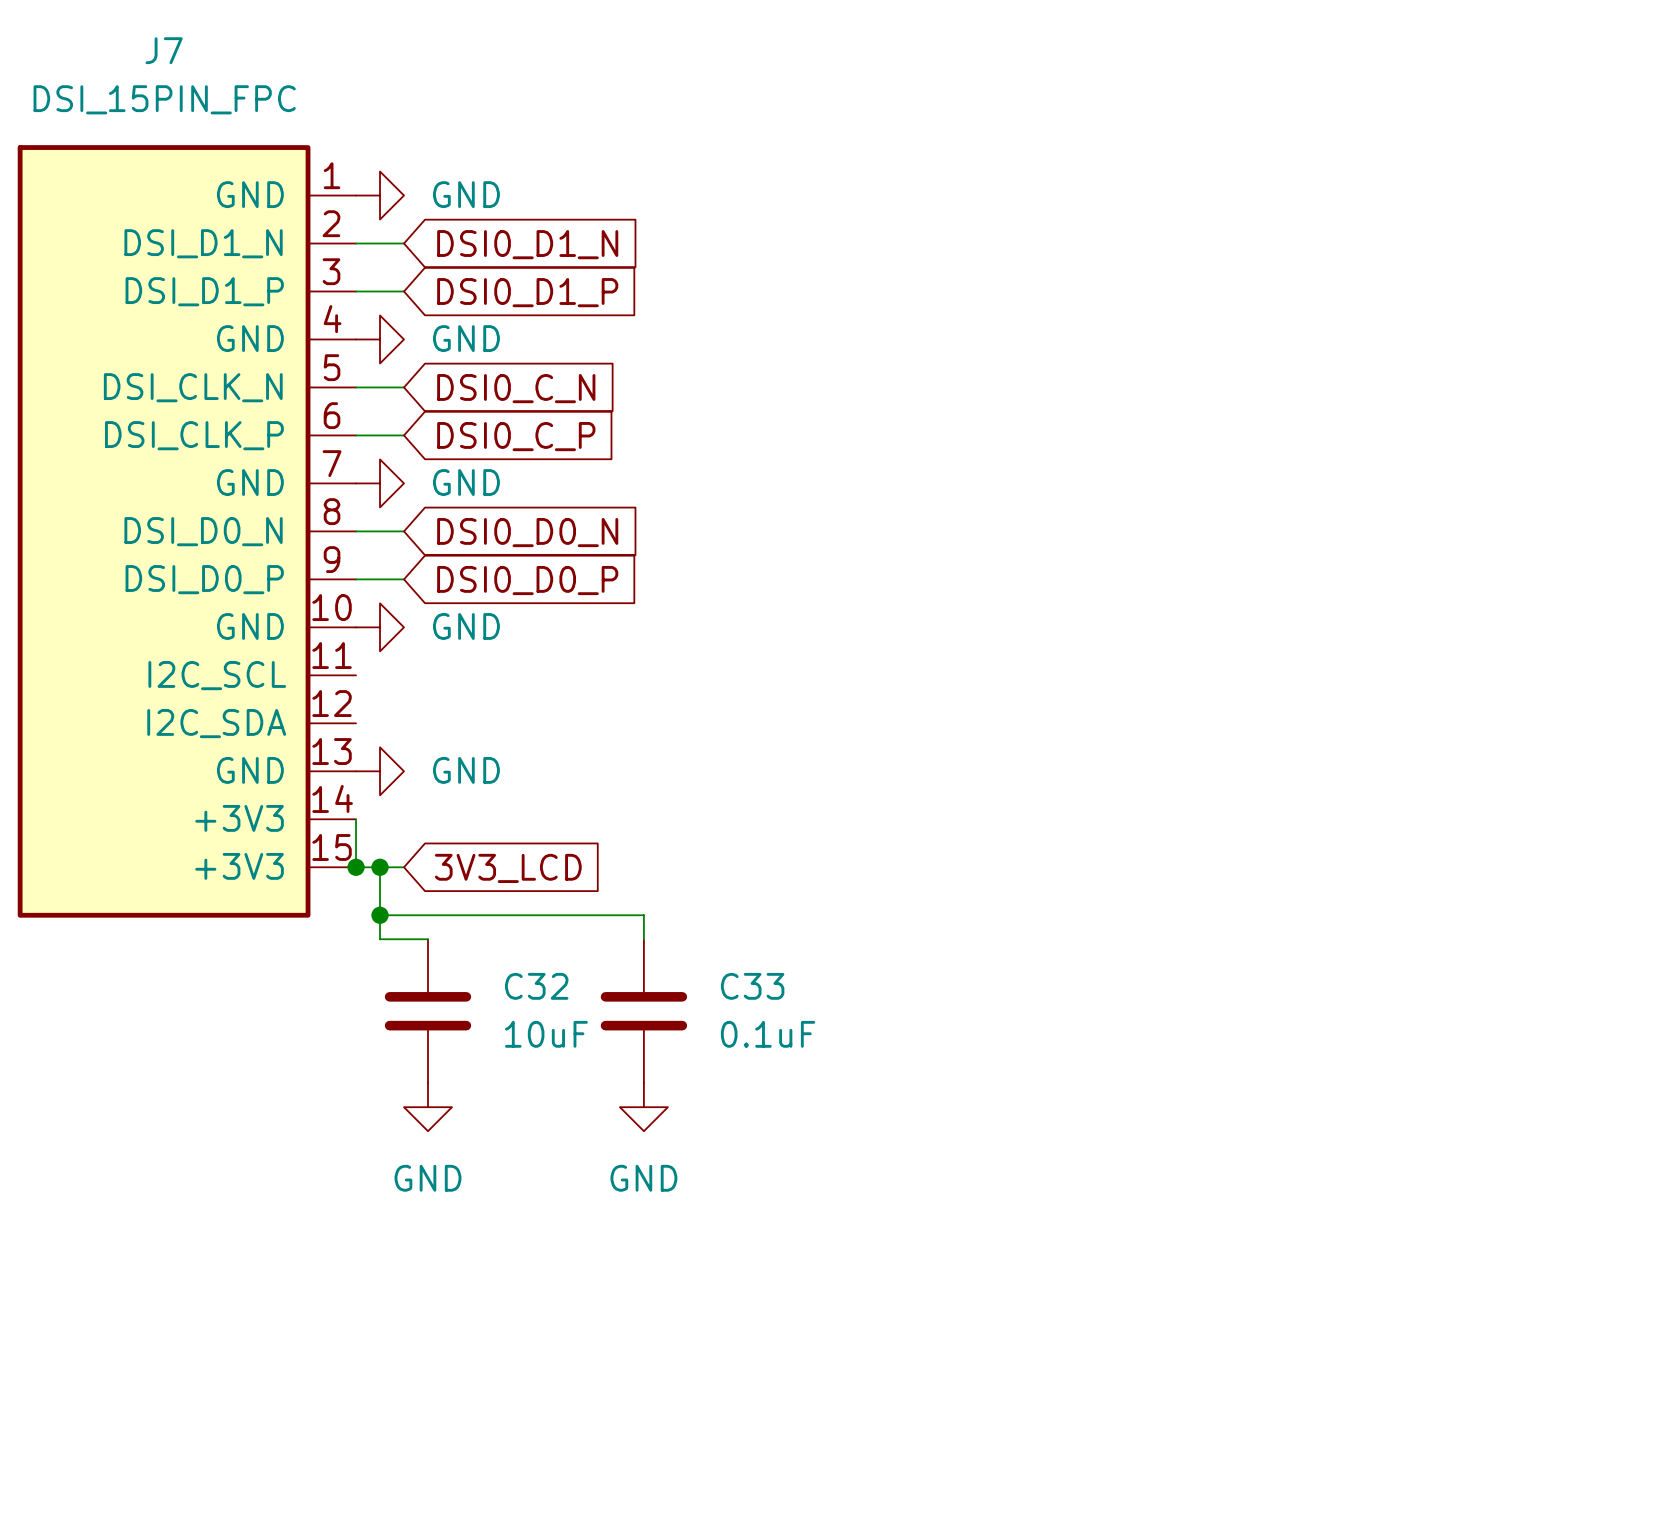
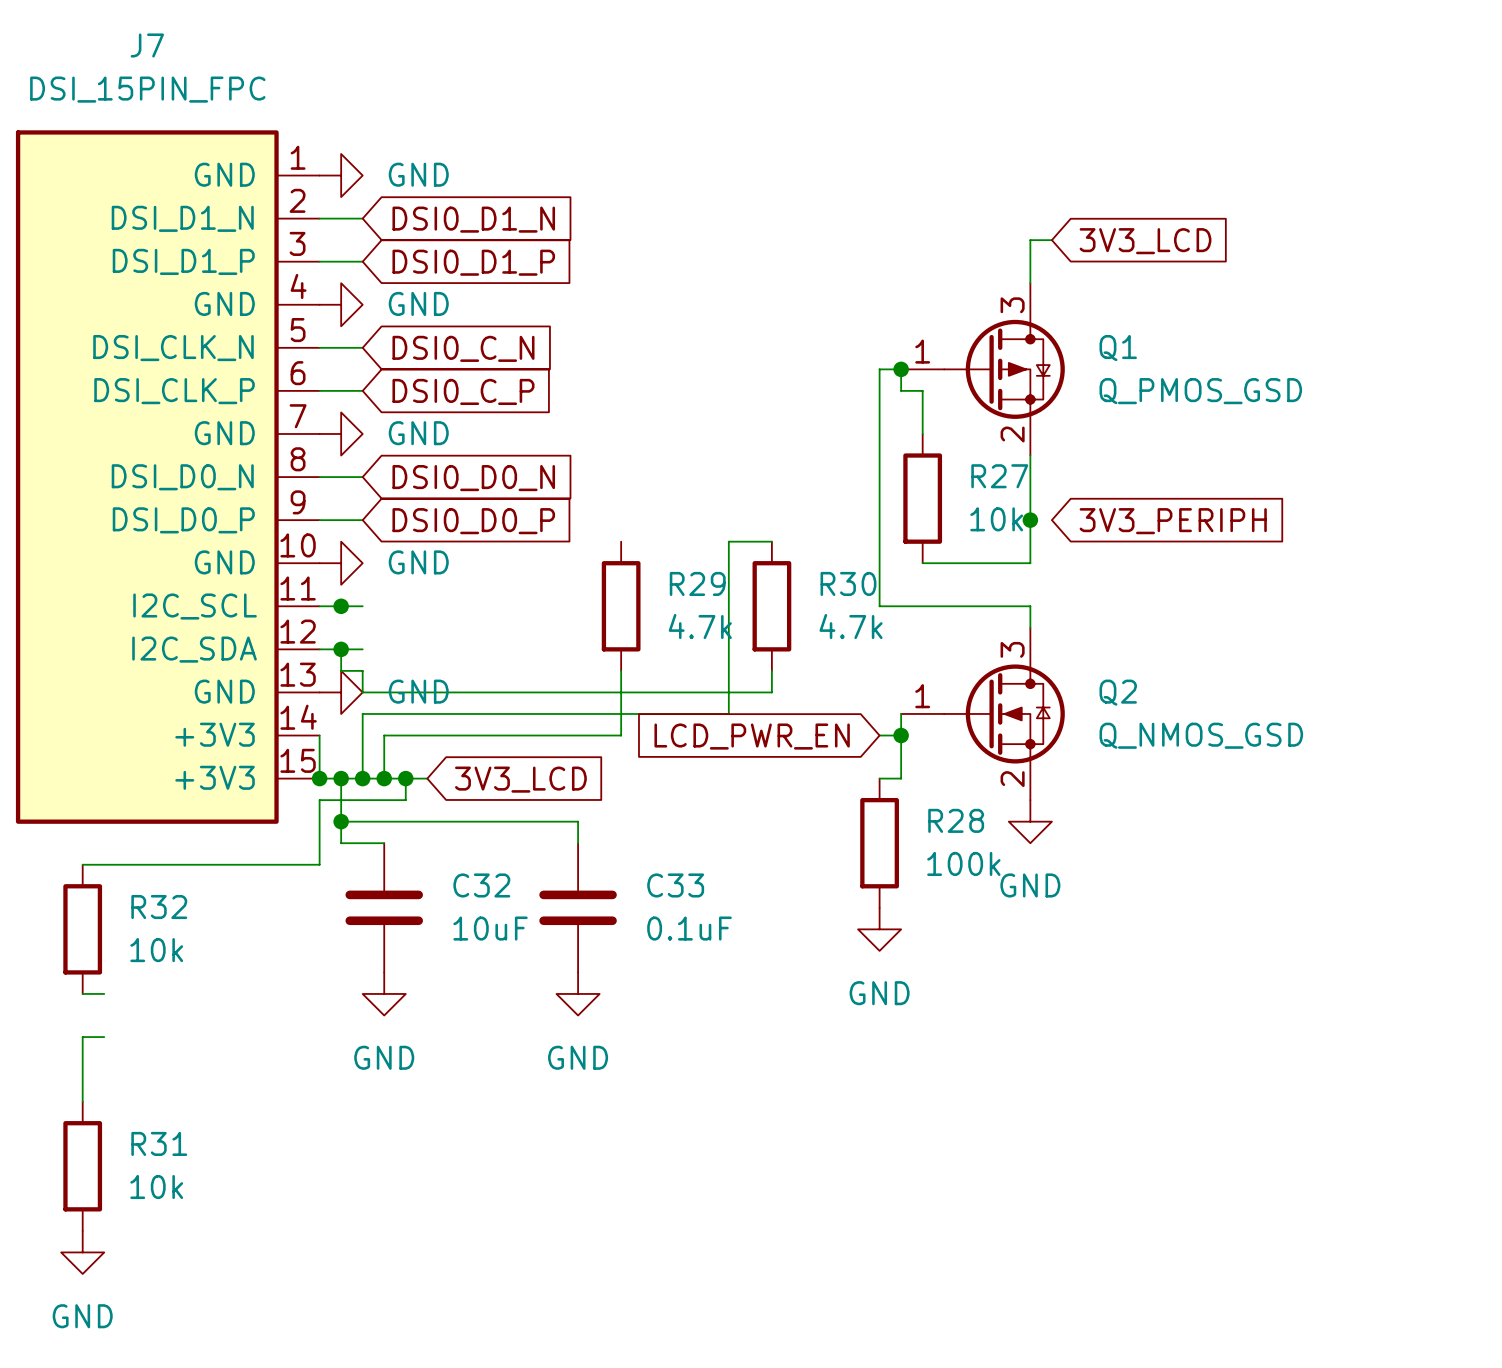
wire: none -> (1051, 240) (1030, 240) (1030, 283)
global label: none -> 3V3_LCD (1145, 241)
junction: none -> (901, 369)
Q1: none -> Q_PMOS_GSD (982, 369)
wire: none -> (922, 433) (922, 390) (901, 390) (901, 369) (879, 369) (879, 606) (1030, 606) (1030, 627)
wire: none -> (1030, 455) (1030, 563) (922, 563)
R27: none -> 10k (922, 498)
junction: none -> (1030, 520)
global label: none -> 3V3_PERIPH (1173, 521)
wire: none -> (771, 541) (728, 541) (728, 713) (362, 713) (362, 778) (427, 778)
wire: none -> (319, 606) (362, 606)
junction: none -> (341, 606)
R29: none -> 4.7k (621, 606)
R30: none -> 4.7k (771, 606)
wire: none -> (319, 649) (362, 649)
wire: none -> (341, 649) (341, 670) (362, 670) (362, 692) (771, 692) (771, 670)
junction: none -> (341, 649)
wire: none -> (621, 670) (621, 735) (384, 735) (384, 778)
wire: none -> (901, 713) (901, 778) (879, 778)
Q2: none -> Q_NMOS_GSD (982, 713)
wire: none -> (879, 735) (901, 735)
junction: none -> (901, 735)
global label: none -> LCD_PWR_EN (752, 736)
junction: none -> (362, 778)
junction: none -> (384, 778)
wire: none -> (405, 778) (405, 800) (319, 800) (319, 864) (82, 864)
junction: none -> (405, 778)
global label position: 3V3_LCD (508, 868) -> 3V3_LCD (520, 779)
power symbol: none -> GND (1030, 821)
R28: none -> 100k (879, 843)
R32: none -> 10k (82, 929)
power symbol: none -> GND (879, 929)
wire: none -> (82, 993) (104, 993)
wire: none -> (104, 1037) (82, 1037) (82, 1101)
R31: none -> 10k (82, 1166)
power symbol: none -> GND (82, 1252)

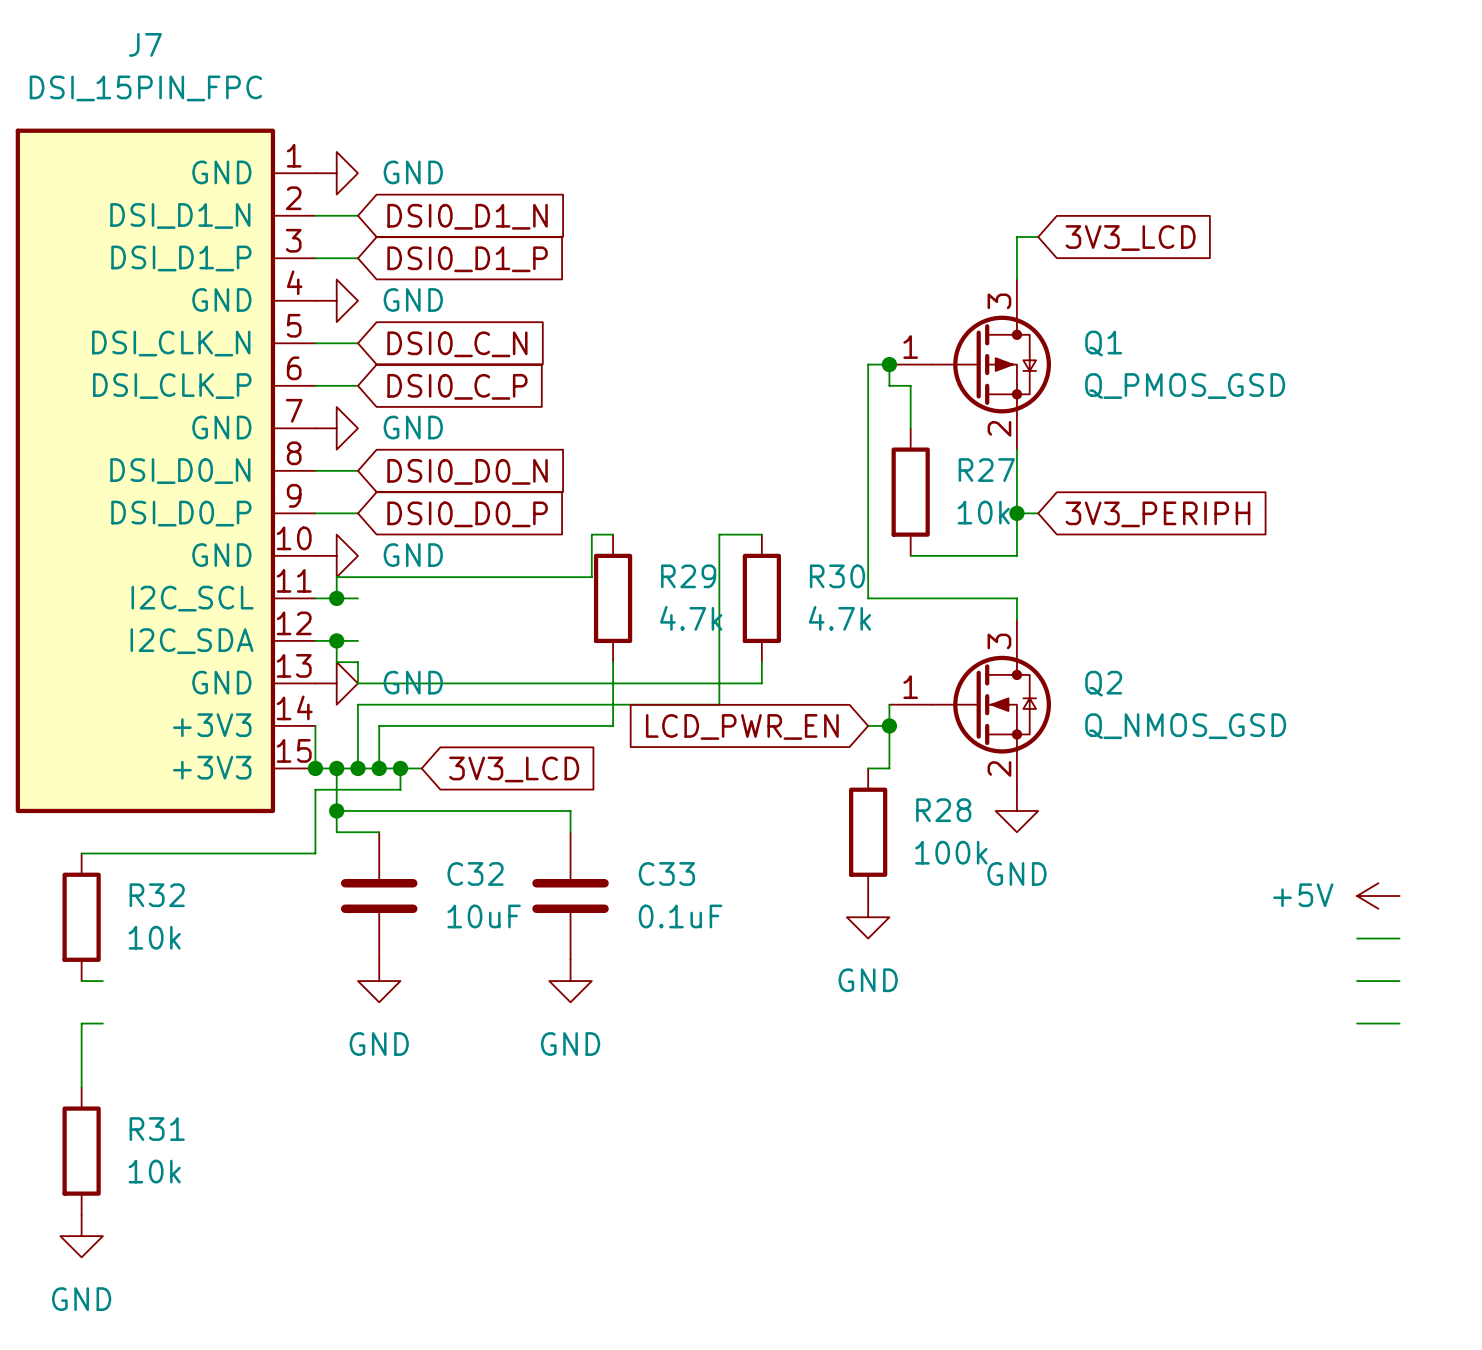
wire: none -> (1016, 513) (1038, 513)
wire: none -> (613, 534) (591, 534) (591, 577) (336, 577) (336, 598)
power symbol: none -> +5V (1378, 896)
wire: none -> (1357, 938) (1399, 938)
wire: none -> (1357, 981) (1399, 981)
wire: none -> (1357, 1023) (1399, 1023)

